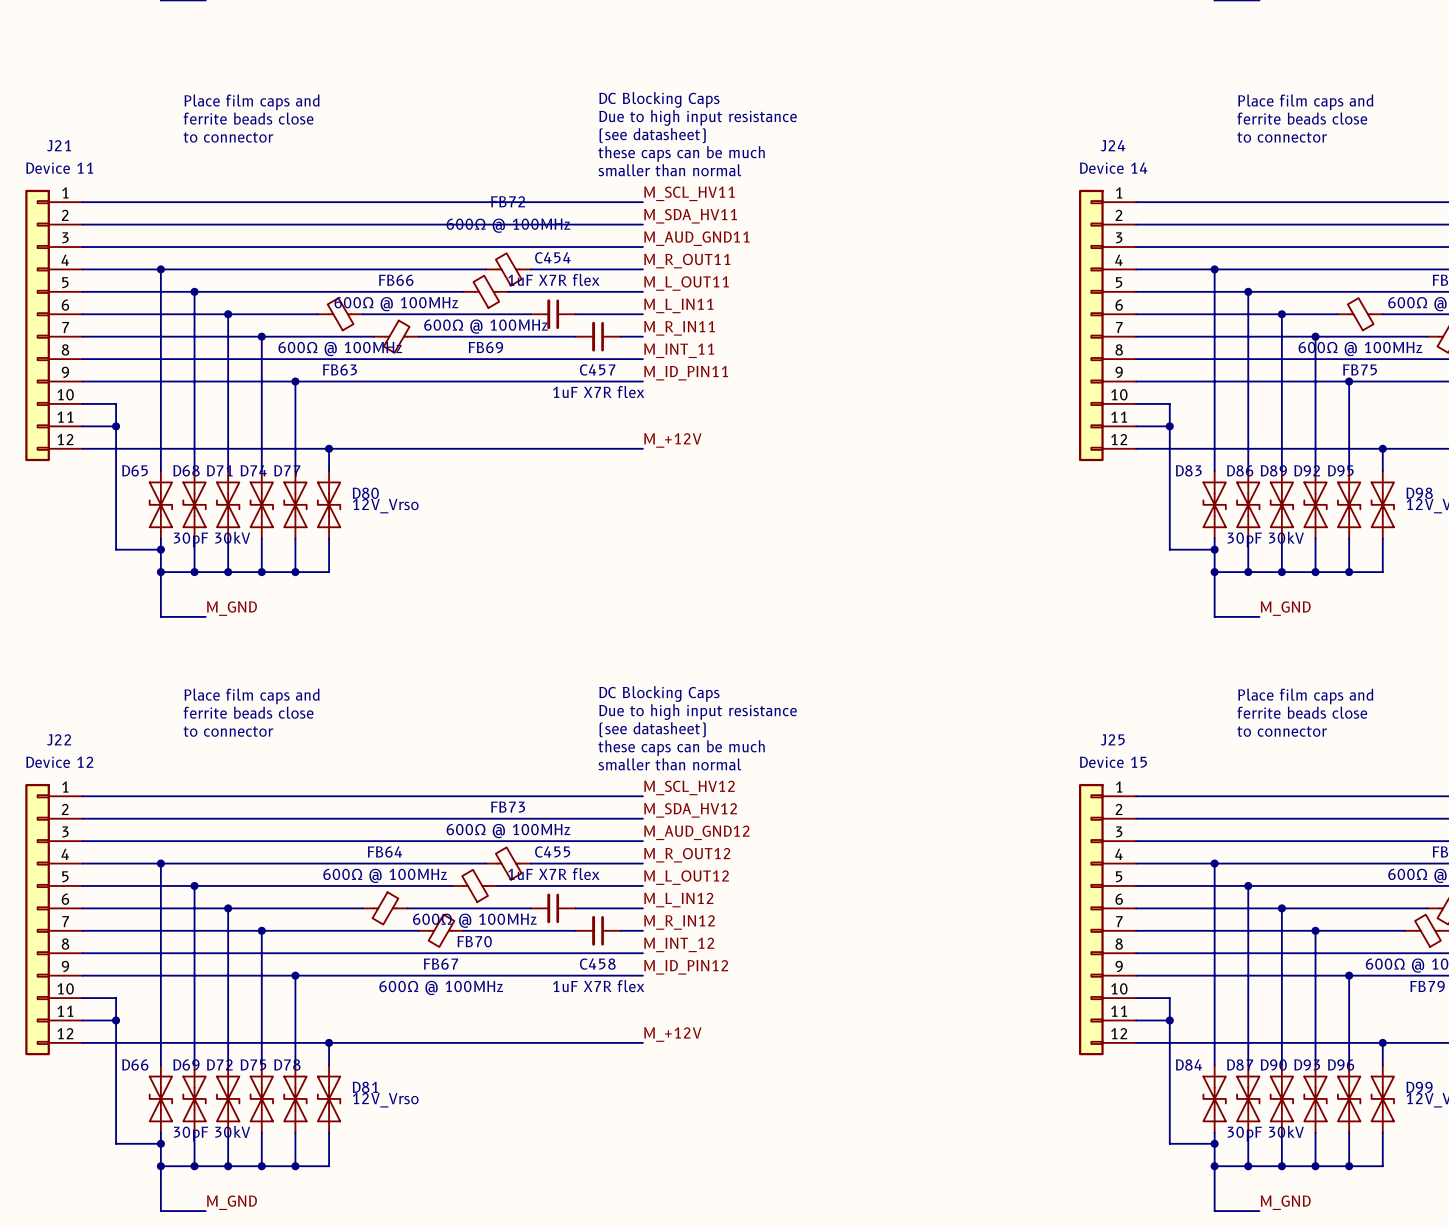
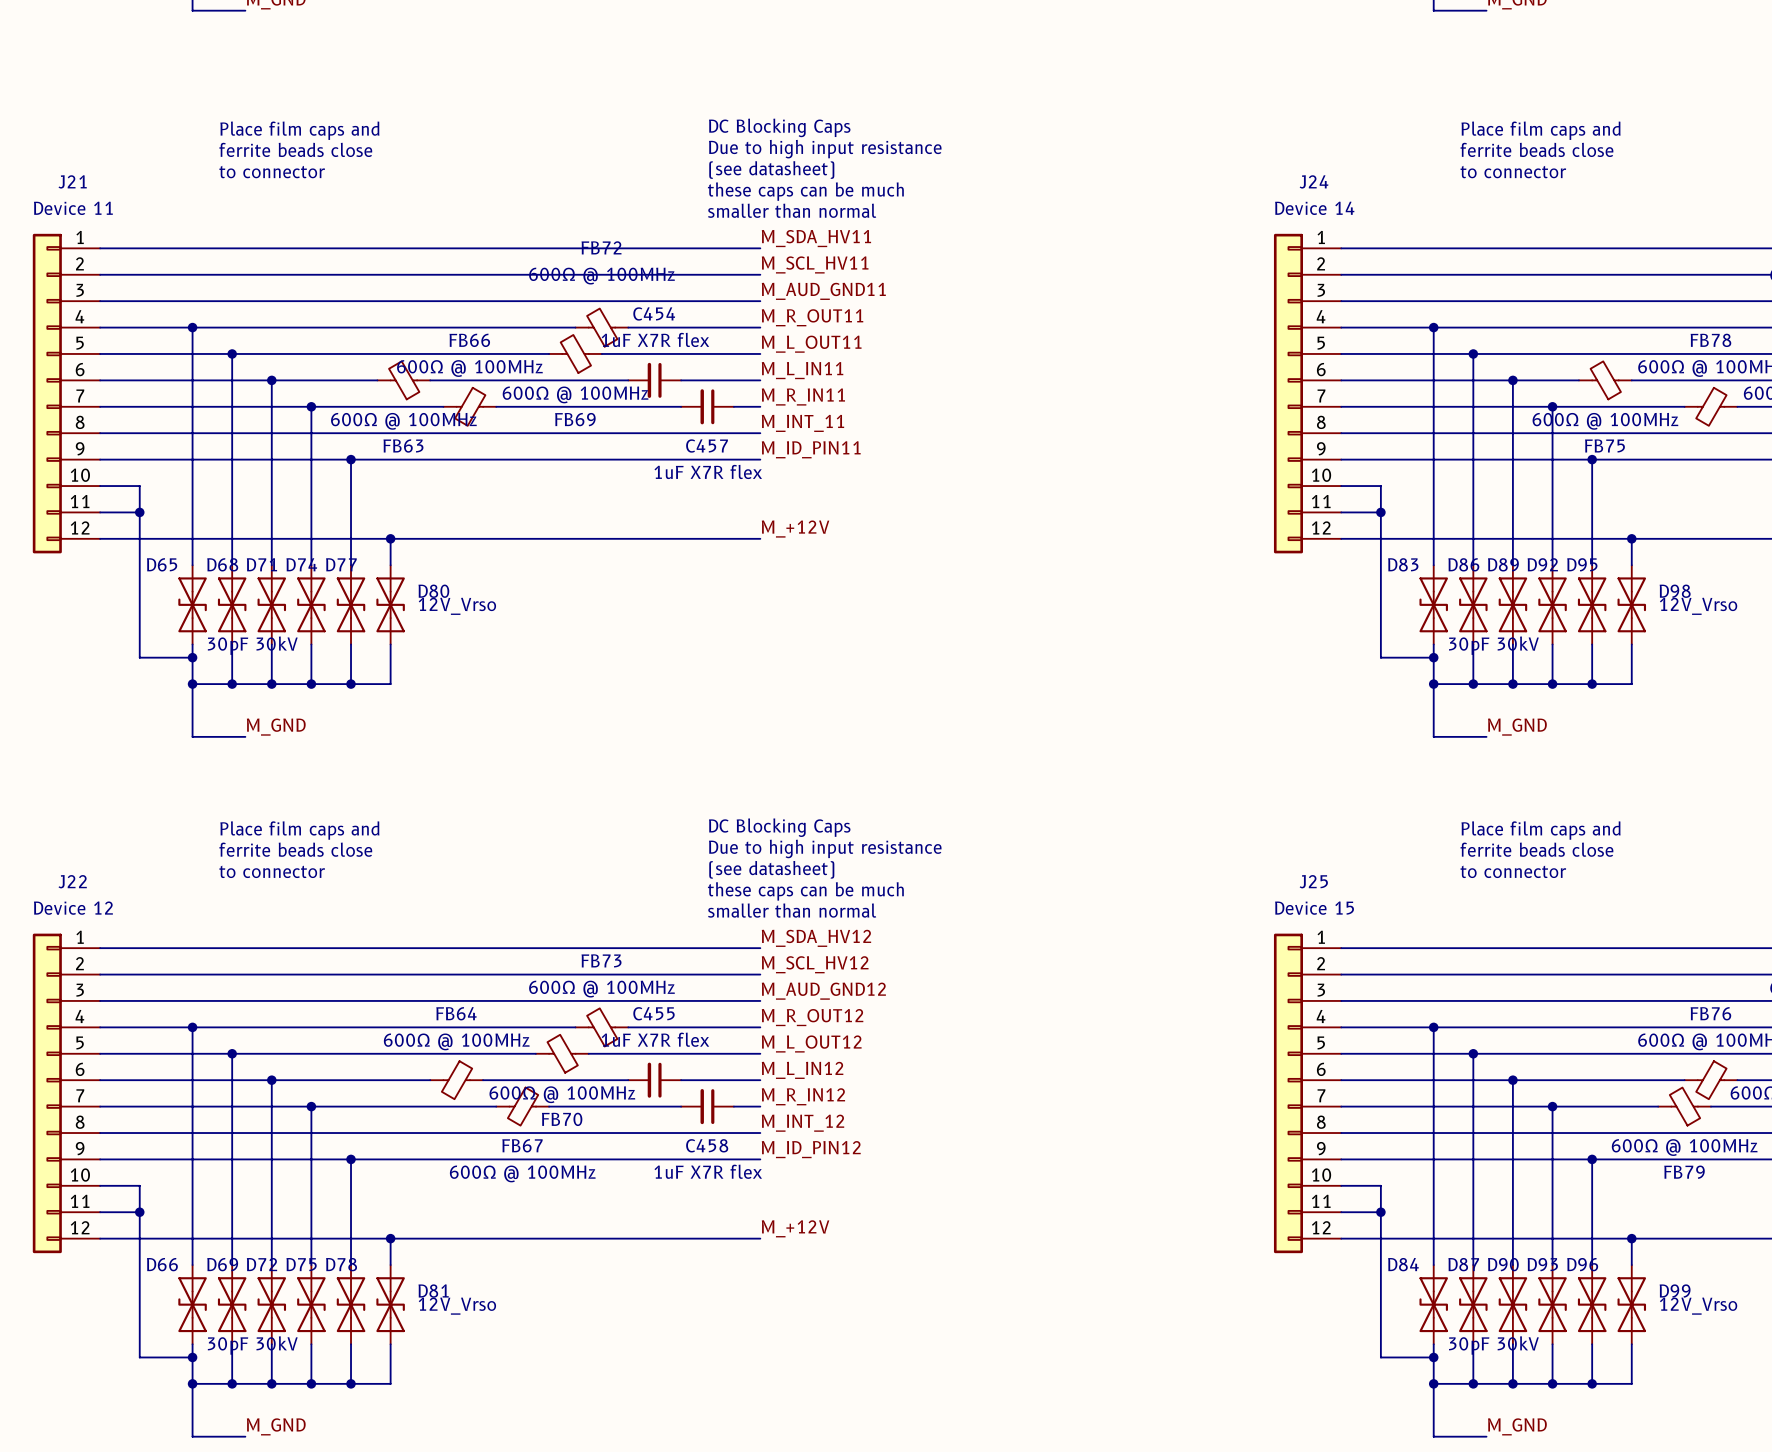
label: M_SCL_HV11 (689, 193) -> M_SDA_HV11 (816, 238)
label: M_SDA_HV11 (690, 216) -> M_SCL_HV11 (815, 264)
label: M_SCL_HV12 (689, 787) -> M_SDA_HV12 (816, 938)
label: M_SDA_HV12 (690, 810) -> M_SCL_HV12 (815, 964)

